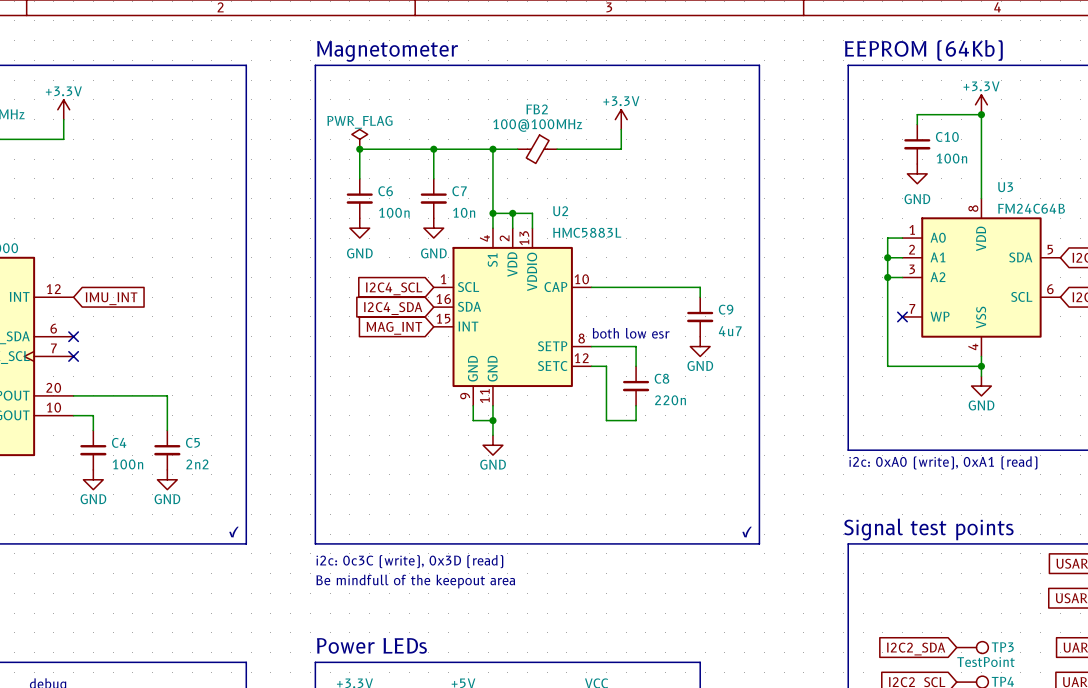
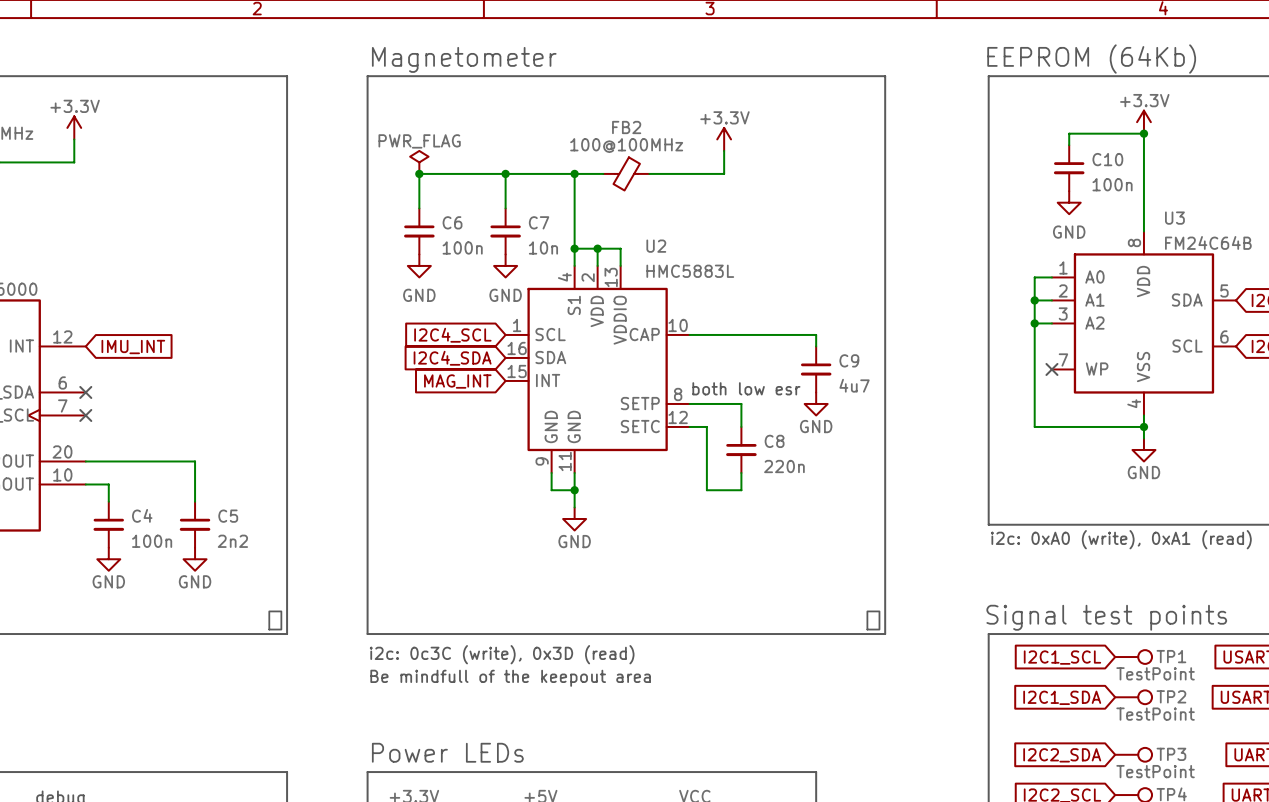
TP1: none -> TestPoint (1133, 657)
global label: none -> I2C1_SCL (1062, 657)
TP2: none -> TestPoint (1133, 697)
global label: none -> I2C1_SDA (1062, 697)

